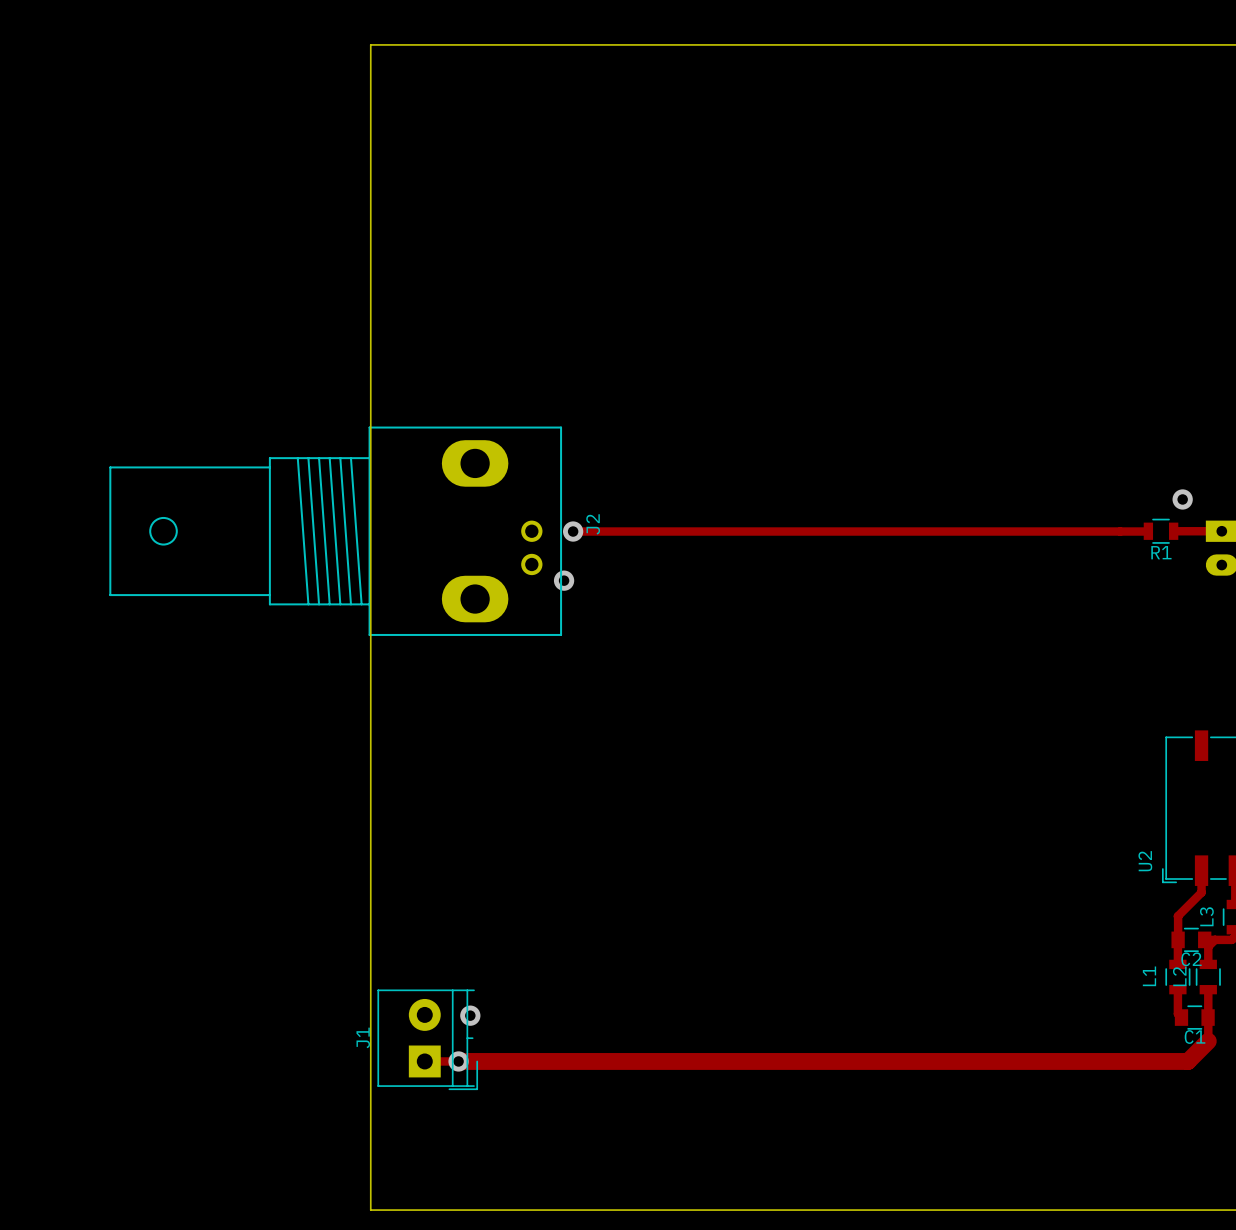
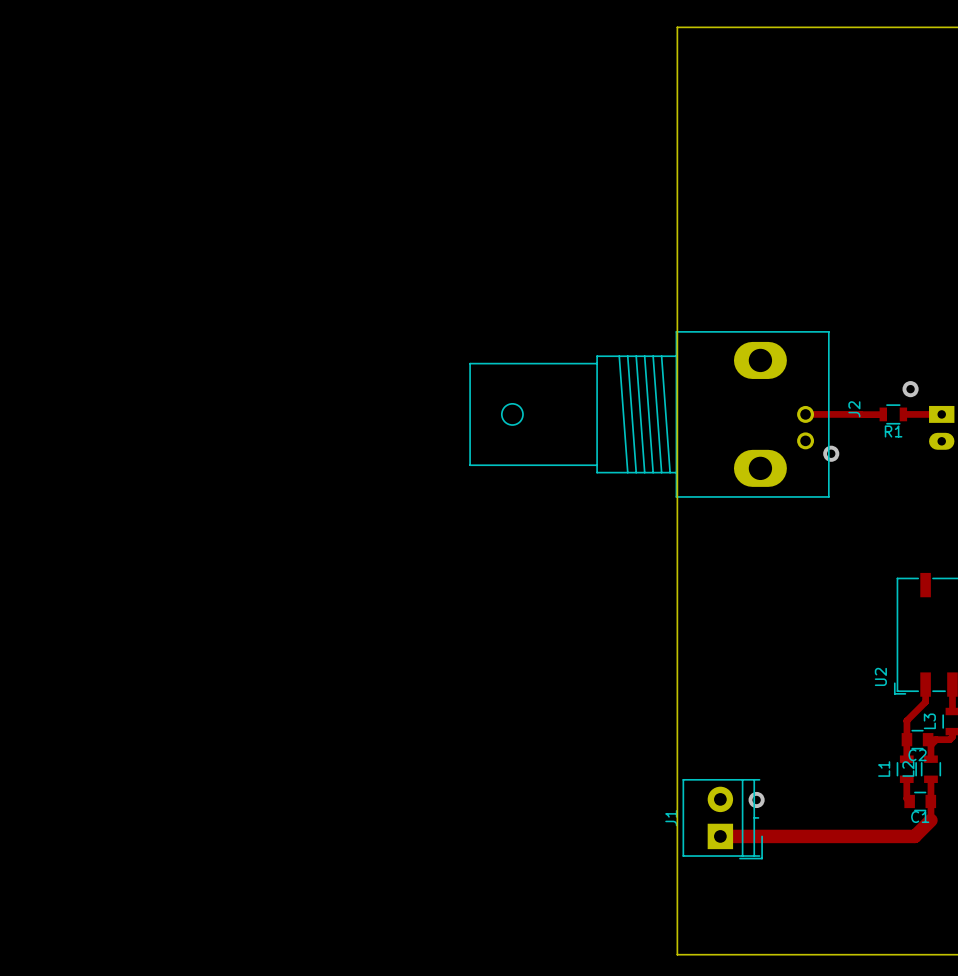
board edge: (889, 44) (370, 44) (370, 1210) (889, 1210) -> (677, 27) (677, 954)
J2 position: (335, 531) -> (649, 414)
track: (573, 531) (1120, 531) -> (805, 414) (860, 414)
via: (573, 531) -> none
via: (564, 580) -> none
via: none -> (831, 453)
via: (470, 1015) -> none
via: none -> (756, 799)
J1 position: (427, 1039) -> (722, 819)
track: (424, 1061) (943, 1061) -> none
via: (458, 1061) -> none

